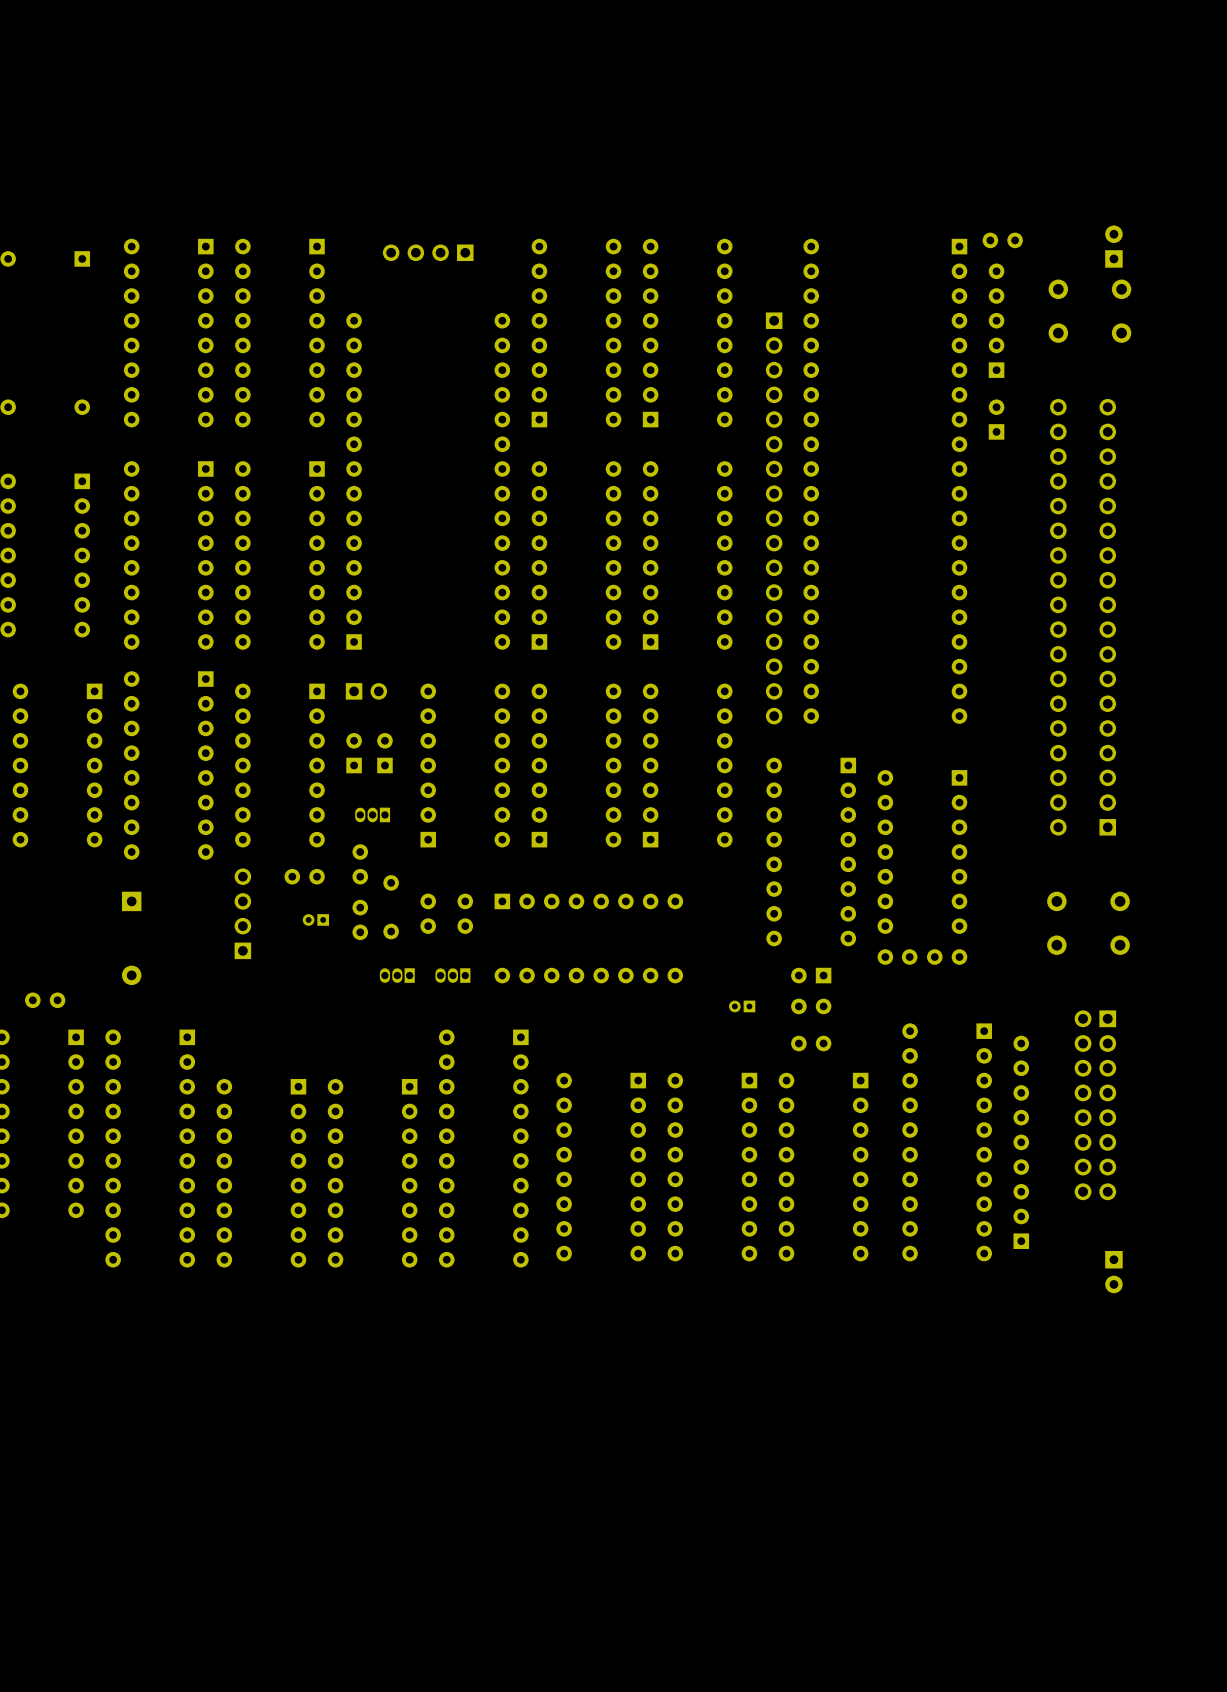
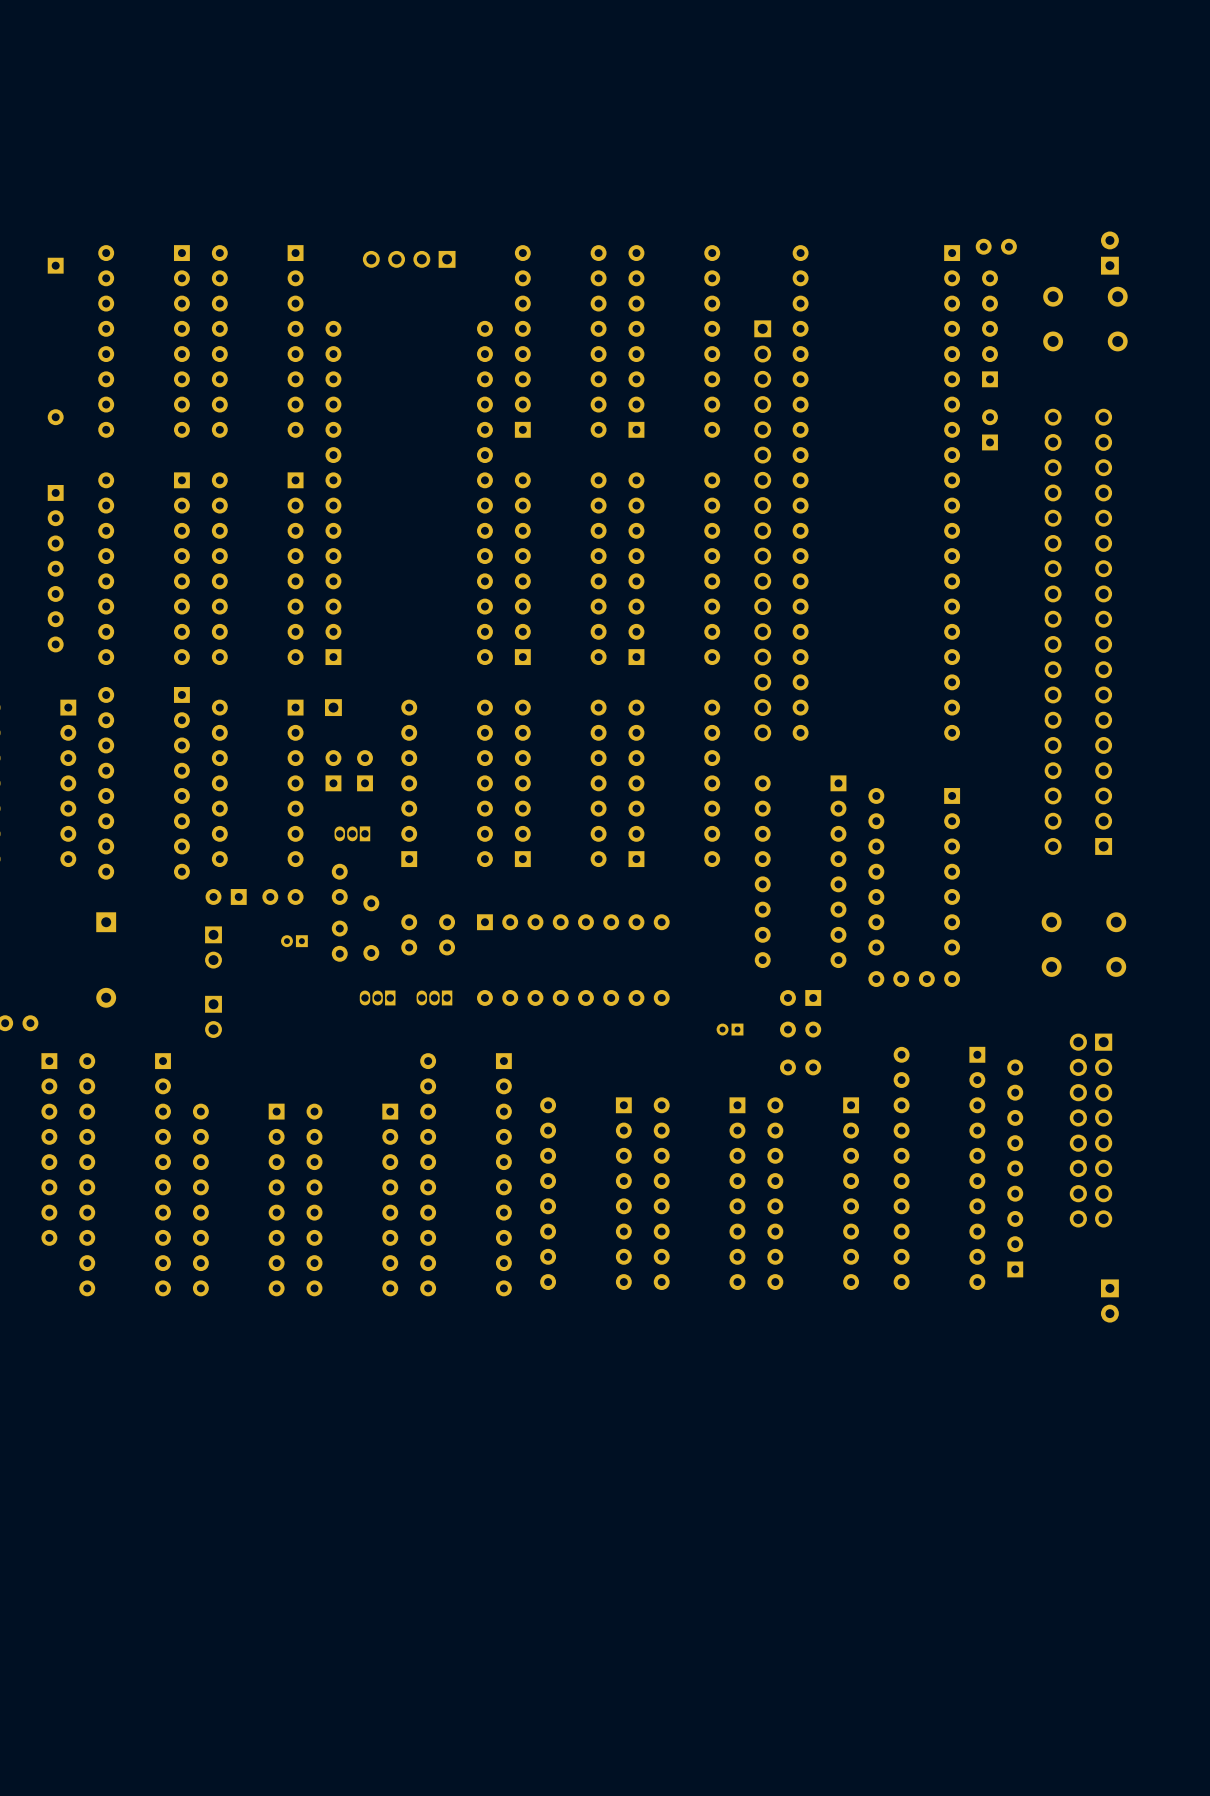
part: (366, 691) -> none
part: none -> (226, 896)
part: (242, 913) -> none
part: none -> (213, 947)
part: none -> (213, 1016)

